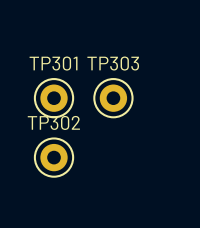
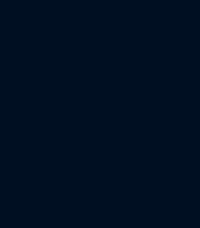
TP301: (54, 98) -> none
TP303: (113, 98) -> none
TP302: (54, 157) -> none

